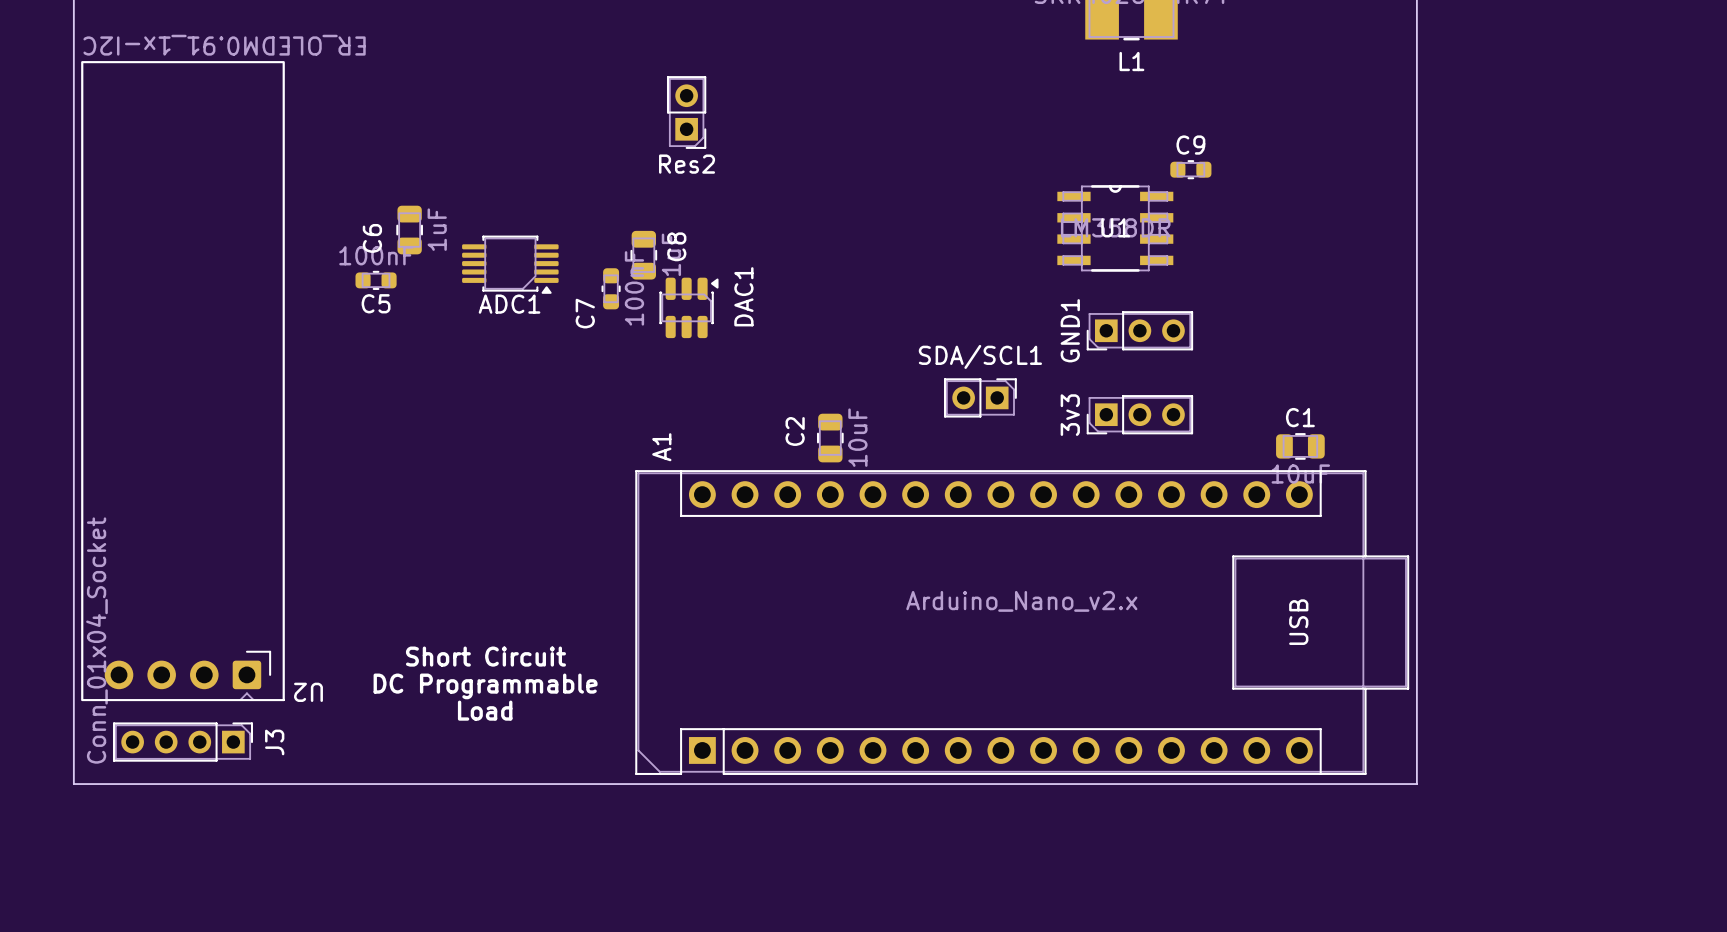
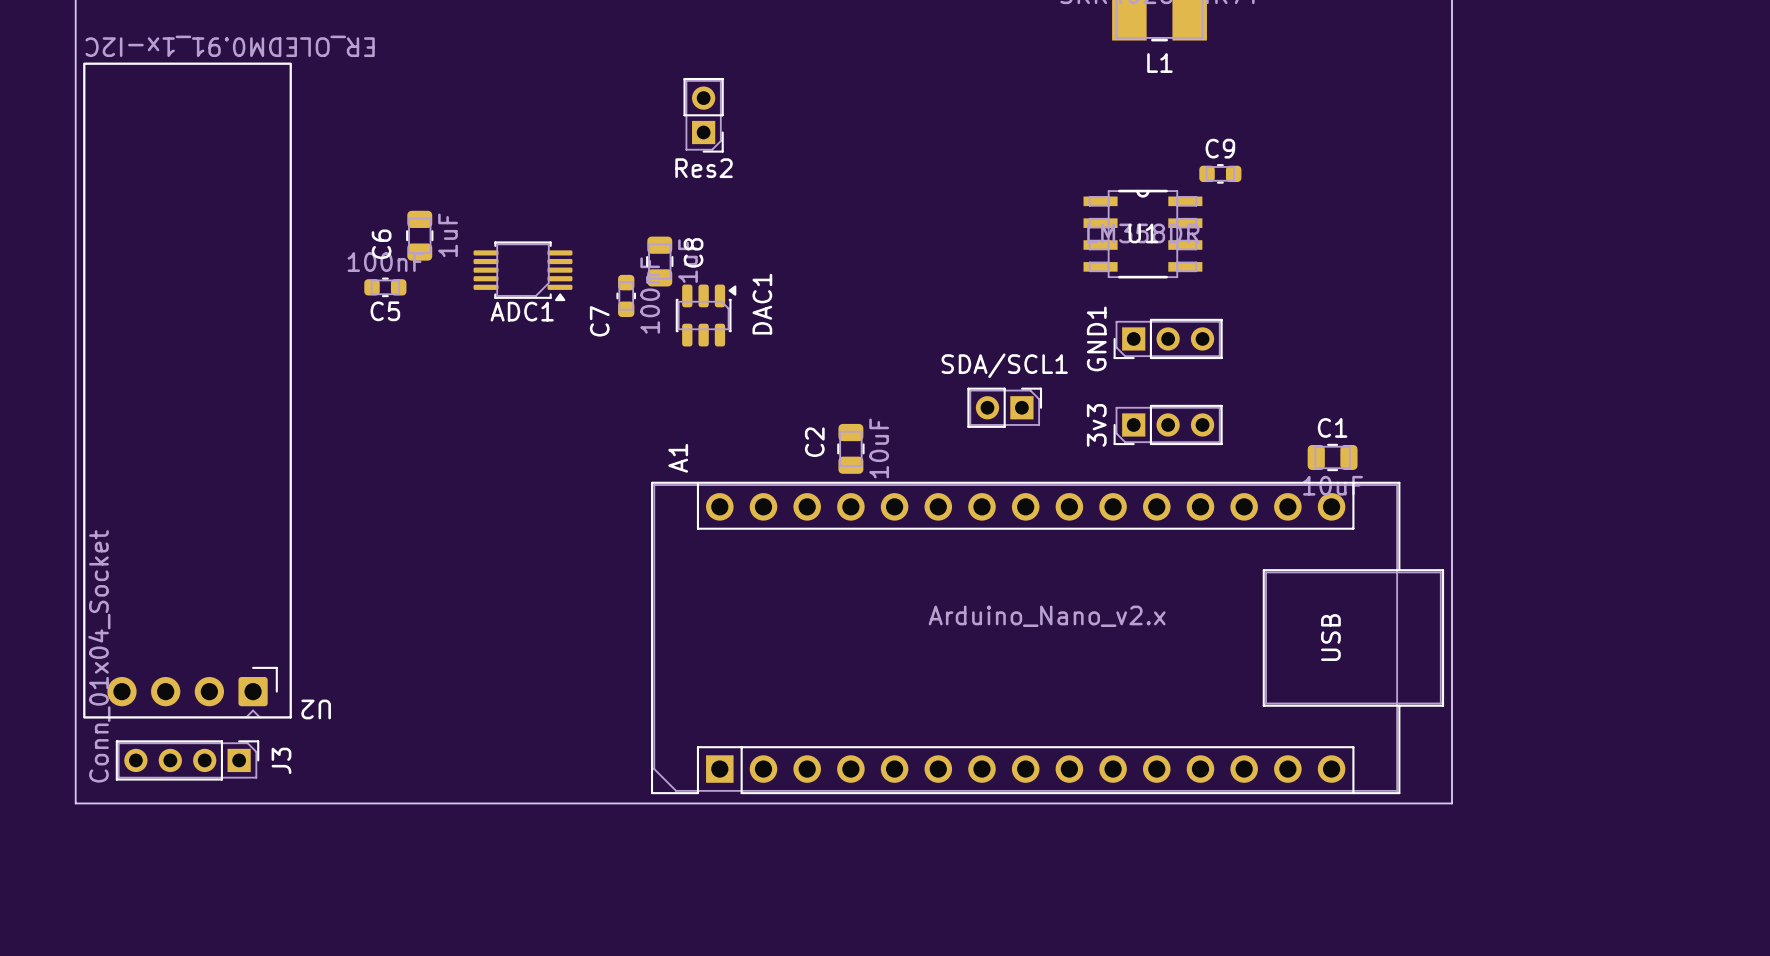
text: Short Circuit (485, 656) -> none
text: DC Programmable (485, 686) -> none
text: Load (485, 710) -> none

